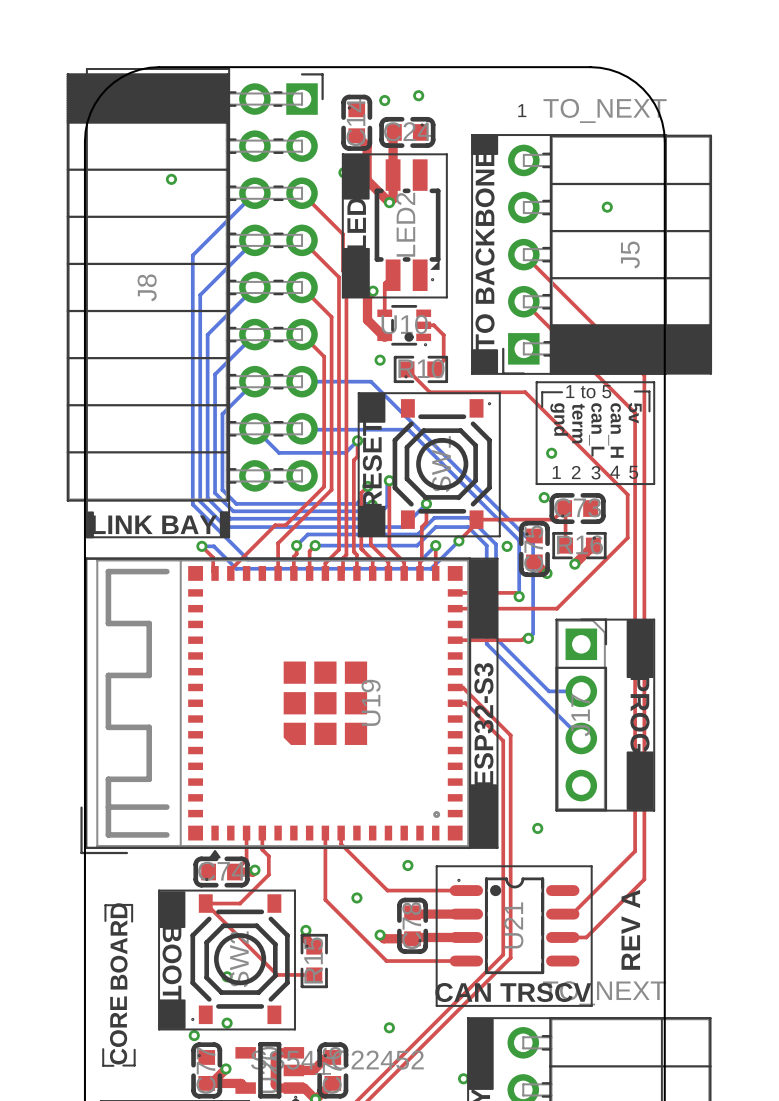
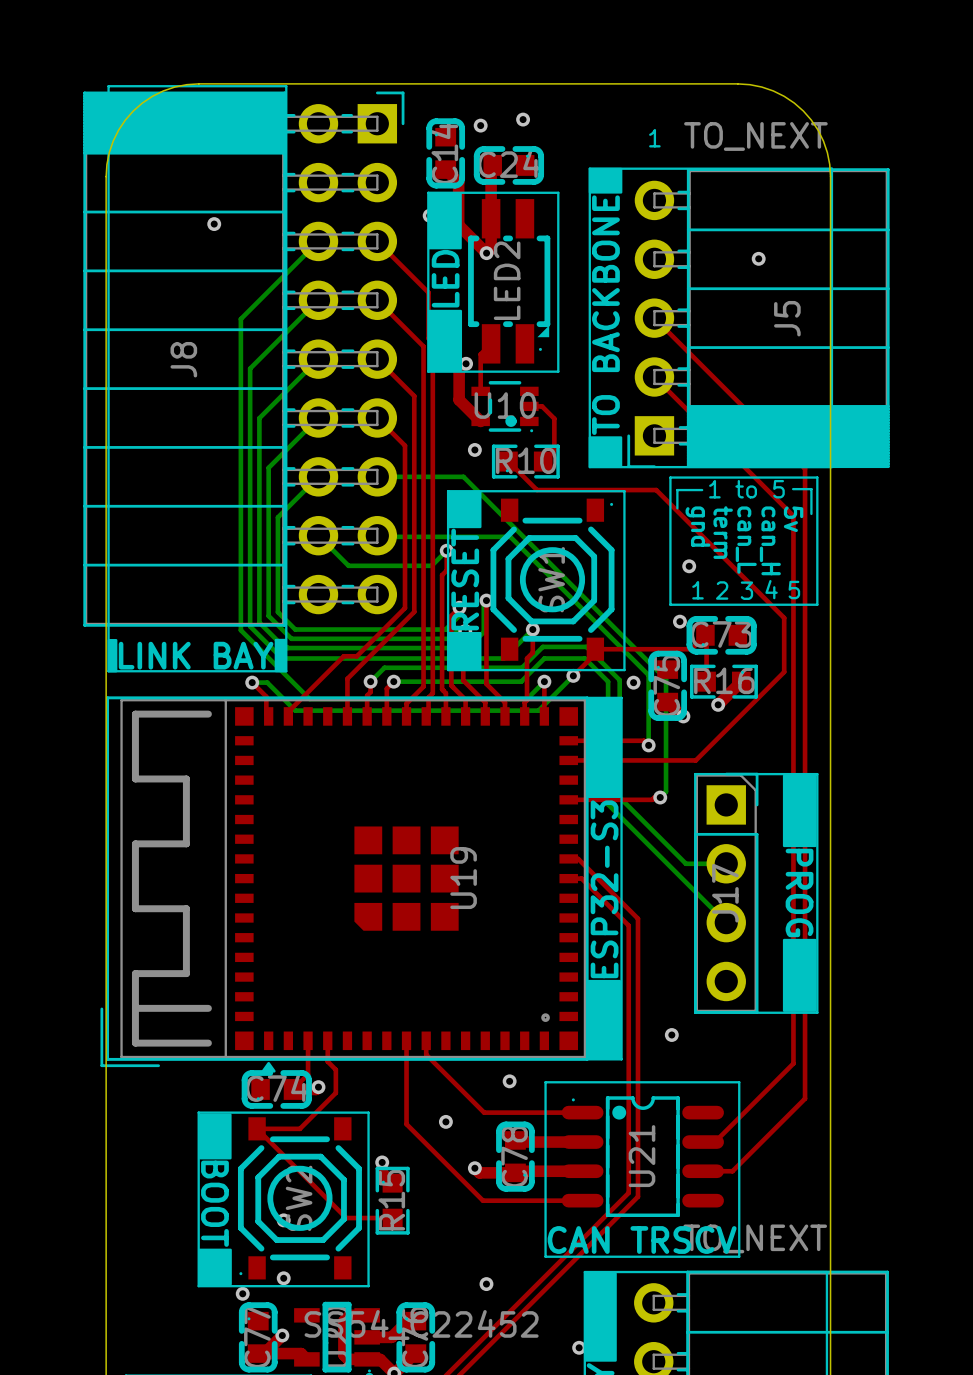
line: (121, 904) (132, 904) (132, 921) -> none
line: (115, 905) (105, 905) (105, 920) -> none
text: REV A (630, 929) -> none
text: BOARD (118, 946) -> none
text: CORE (118, 1030) -> none
line: (103, 1049) (103, 1065) (113, 1065) -> none
line: (134, 1049) (134, 1065) (123, 1065) -> none

